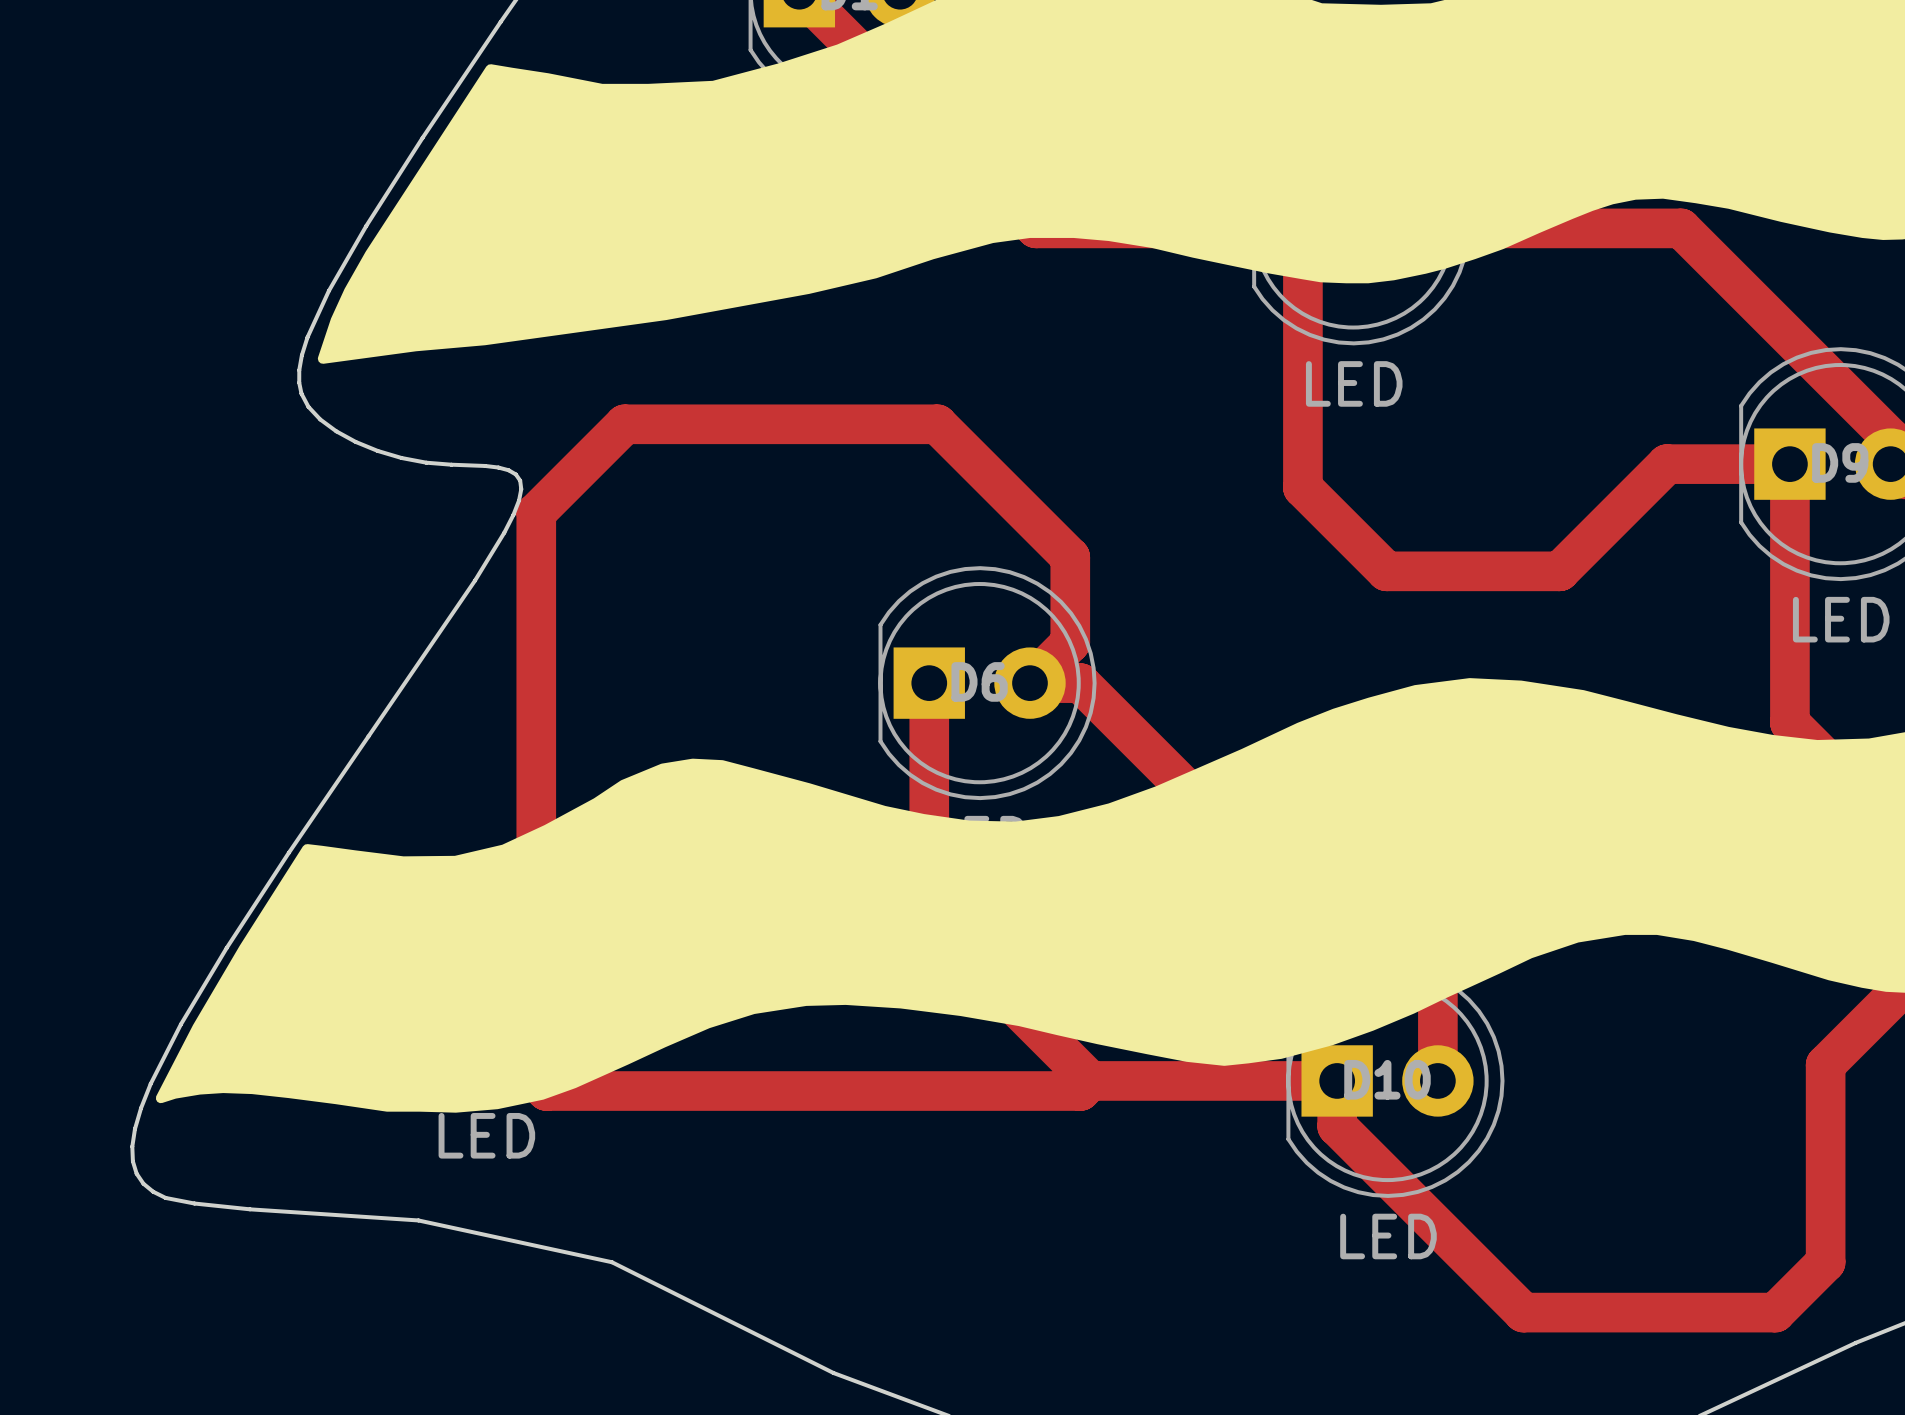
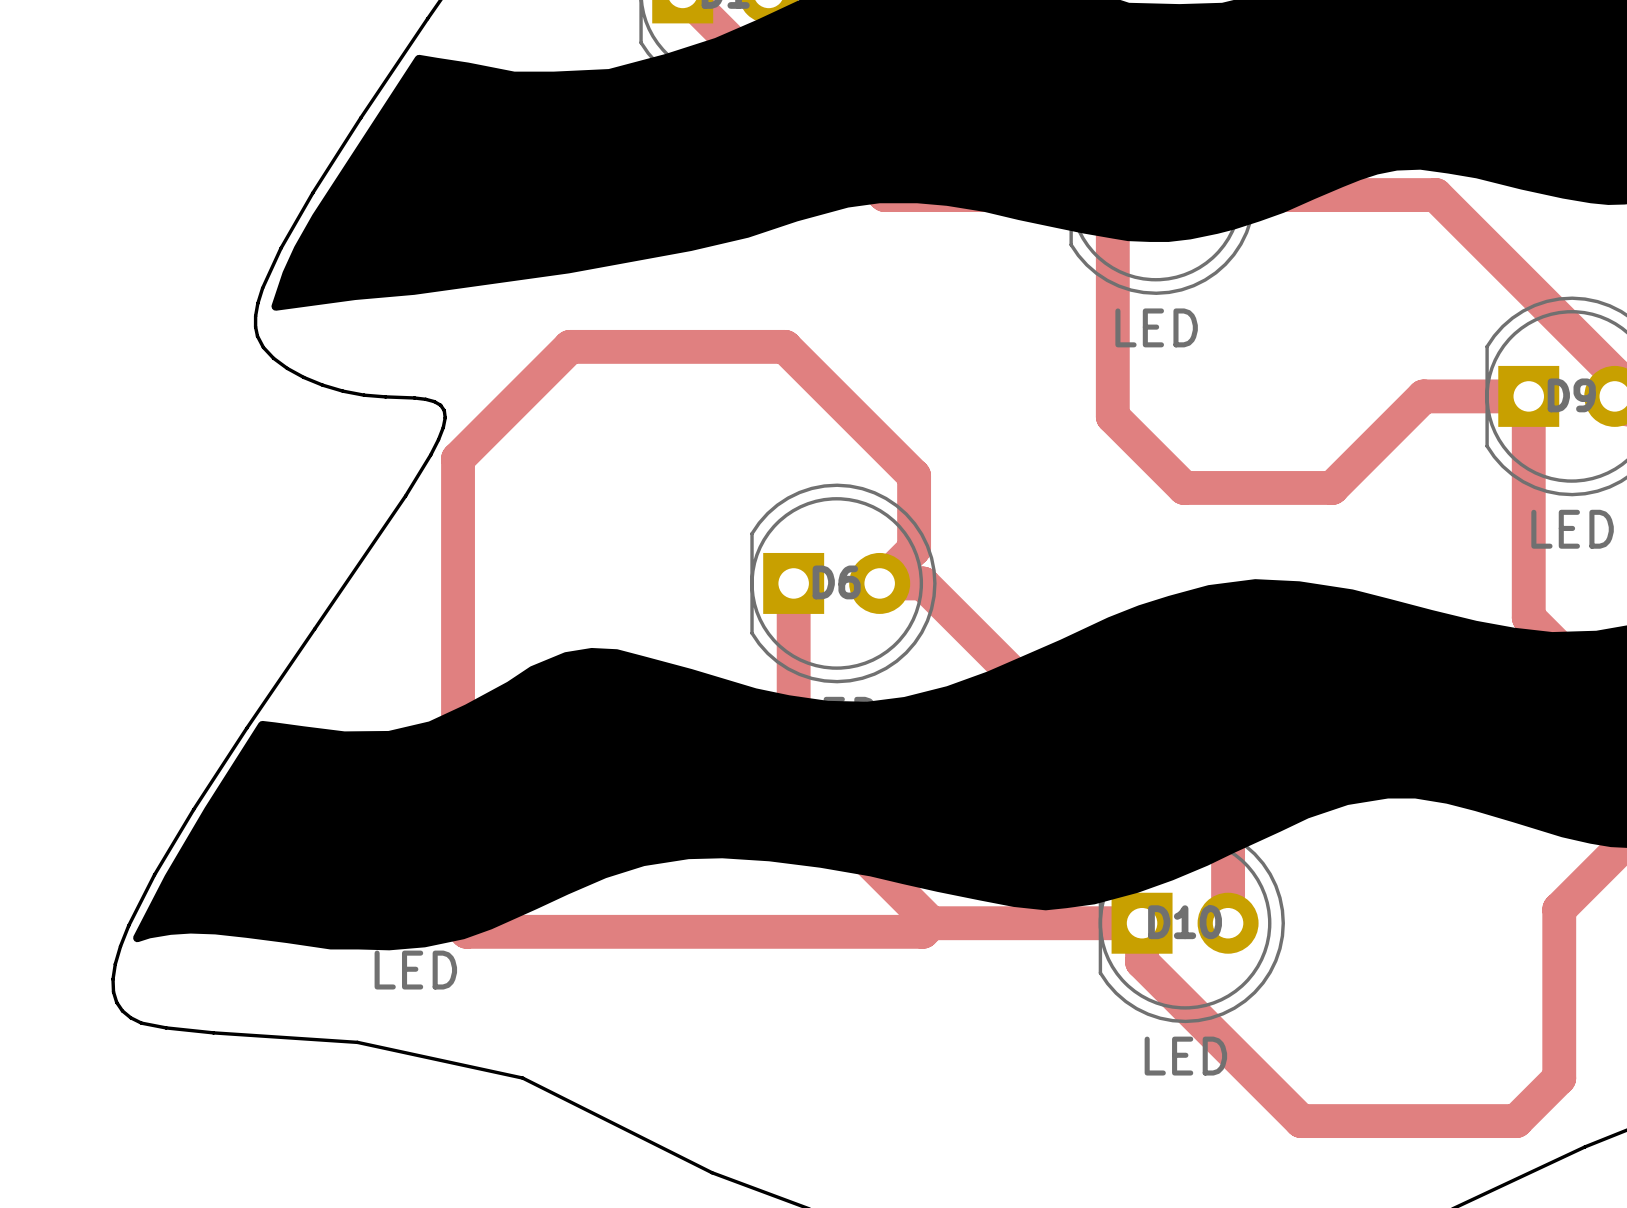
track: (937, 424) (624, 424) (536, 512) (536, 537) -> (800, 362) (785, 346) (570, 346) (458, 458)

